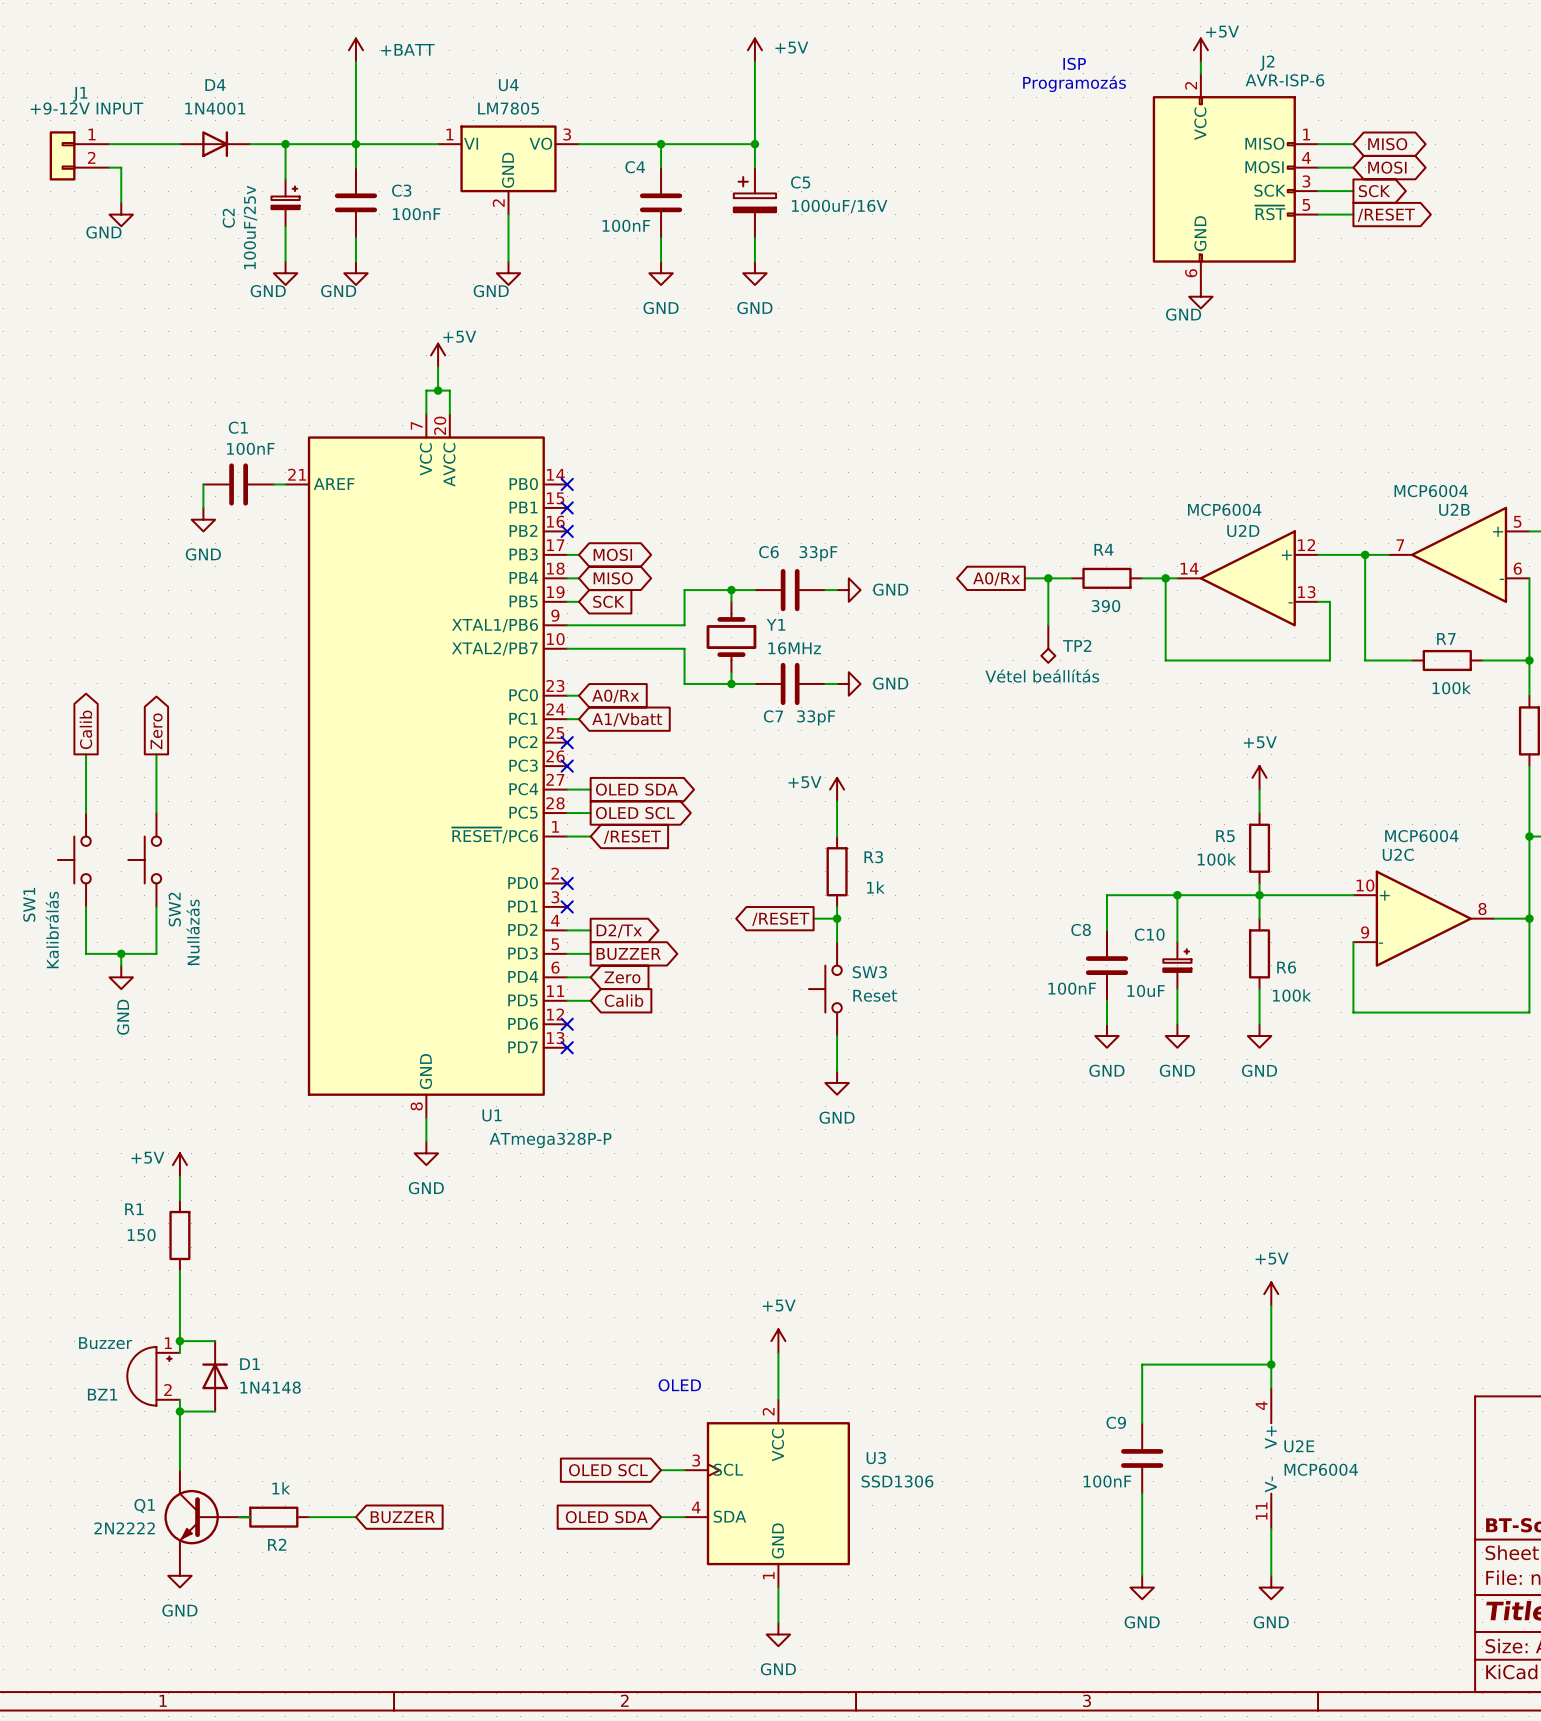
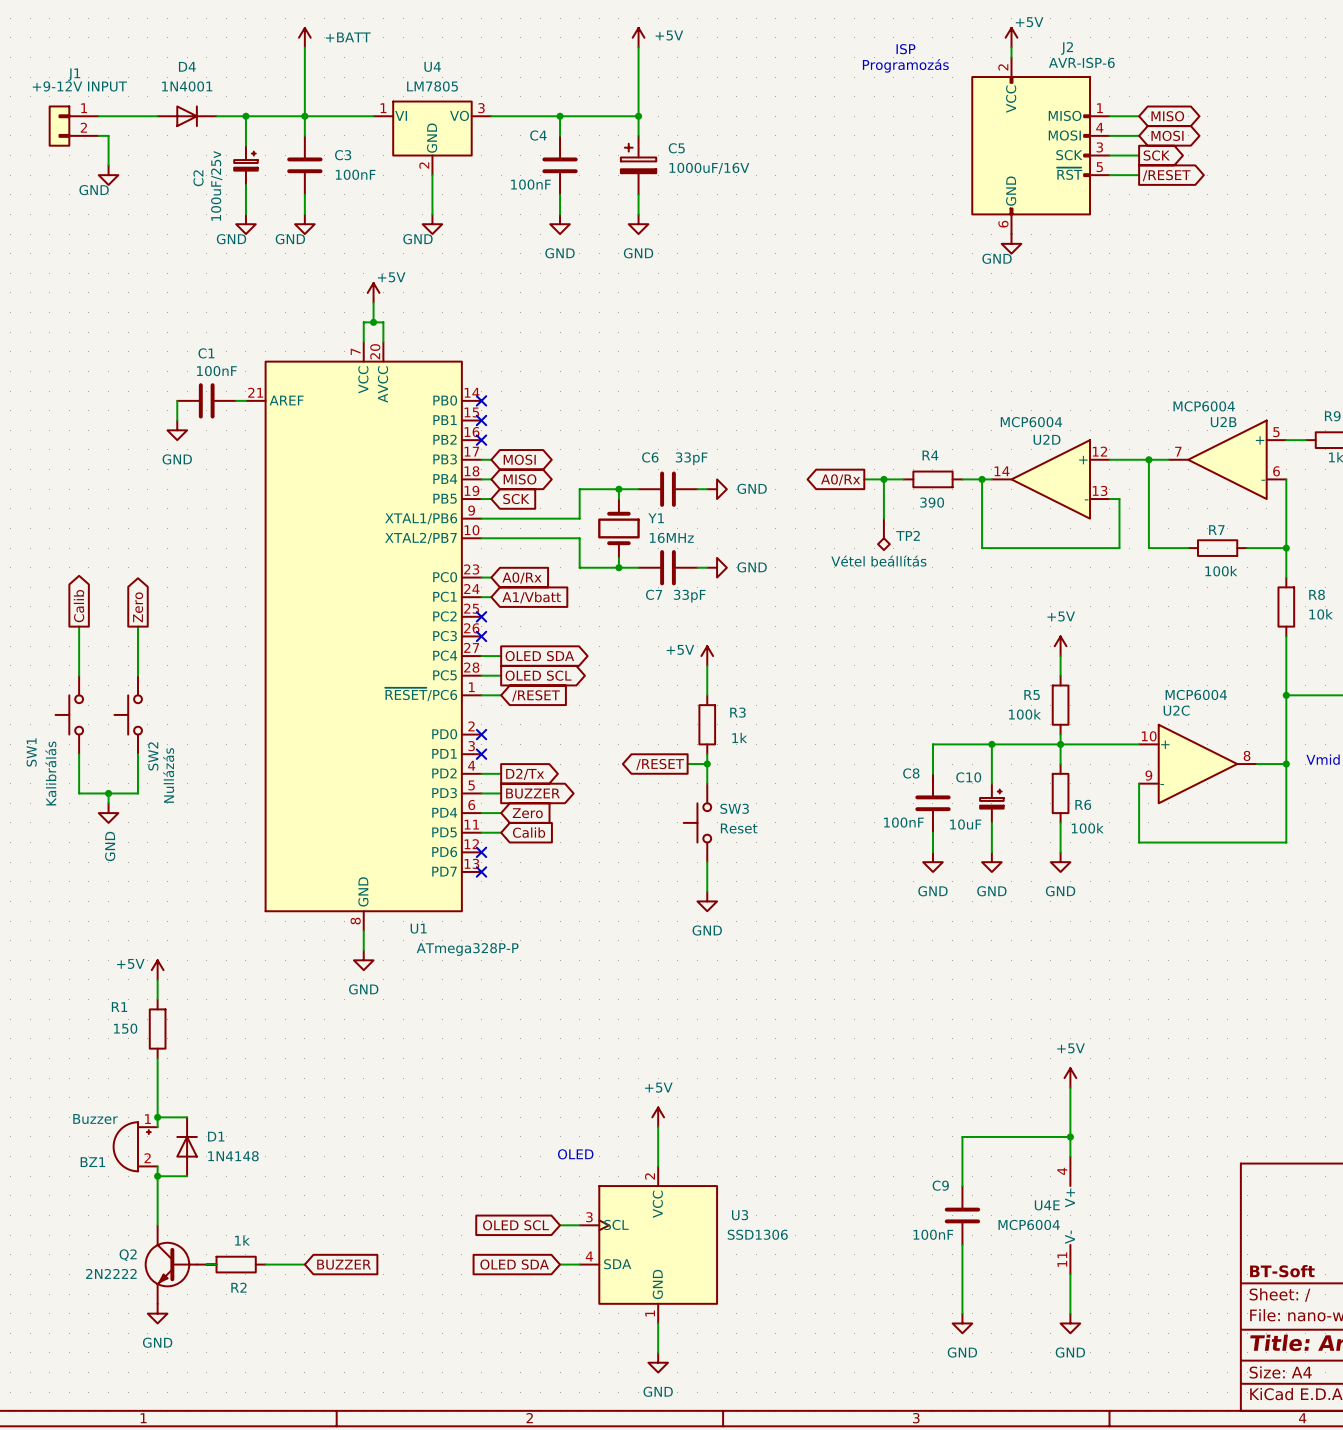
U2E name: U2E (1299, 1446) -> U4E (1047, 1205)
U2E value position: MCP6004 (1321, 1469) -> MCP6004 (1029, 1224)
Q1 name: Q1 (144, 1505) -> Q2 (128, 1255)

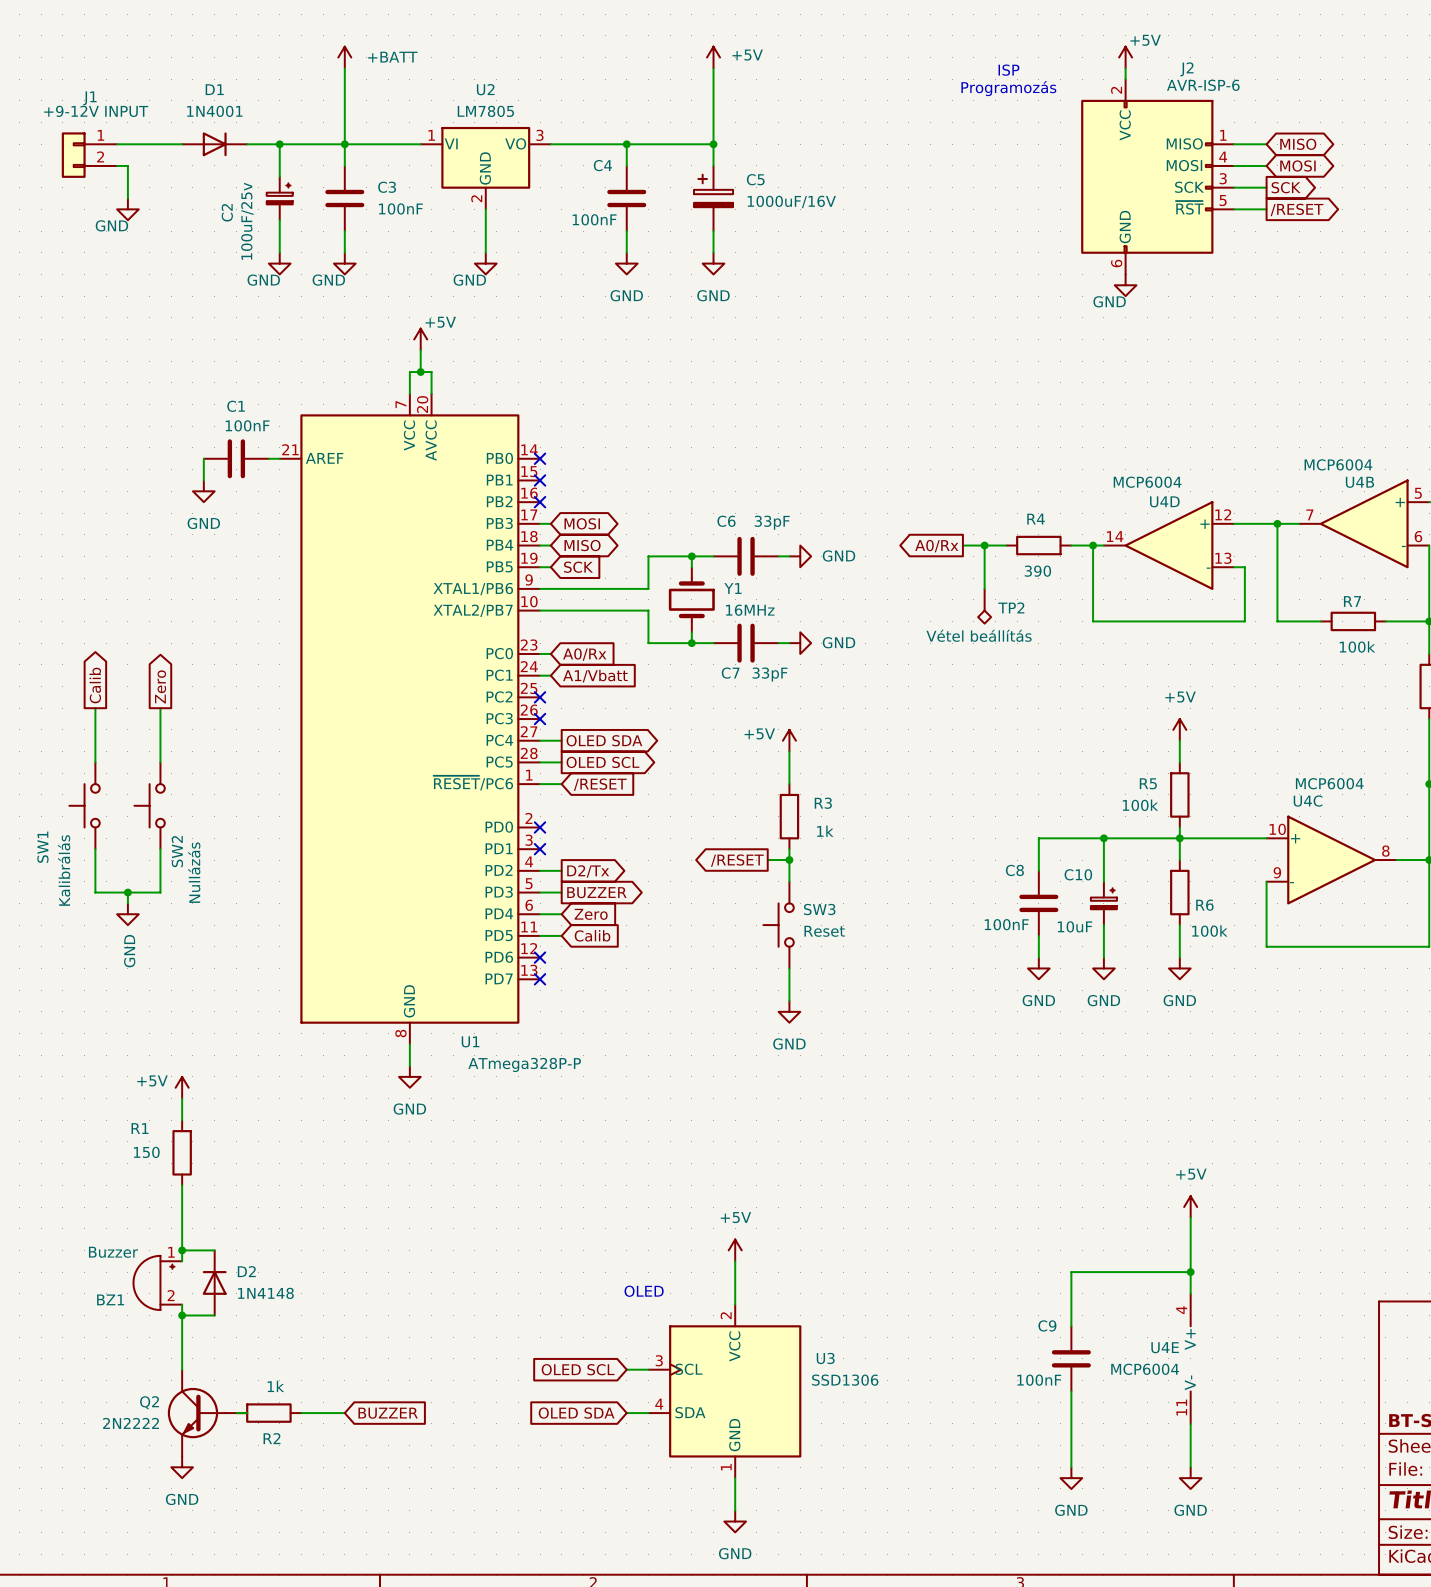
D4 name: D4 (187, 66) -> D1 (214, 89)
U4 name: U4 (432, 66) -> U2 (485, 89)
U2B name: U2B (1223, 422) -> U4B (1359, 482)
U2D name: U2D (1047, 439) -> U4D (1164, 501)
U2C name: U2C (1176, 710) -> U4C (1308, 801)
D1 name: D1 (216, 1136) -> D2 (246, 1271)

